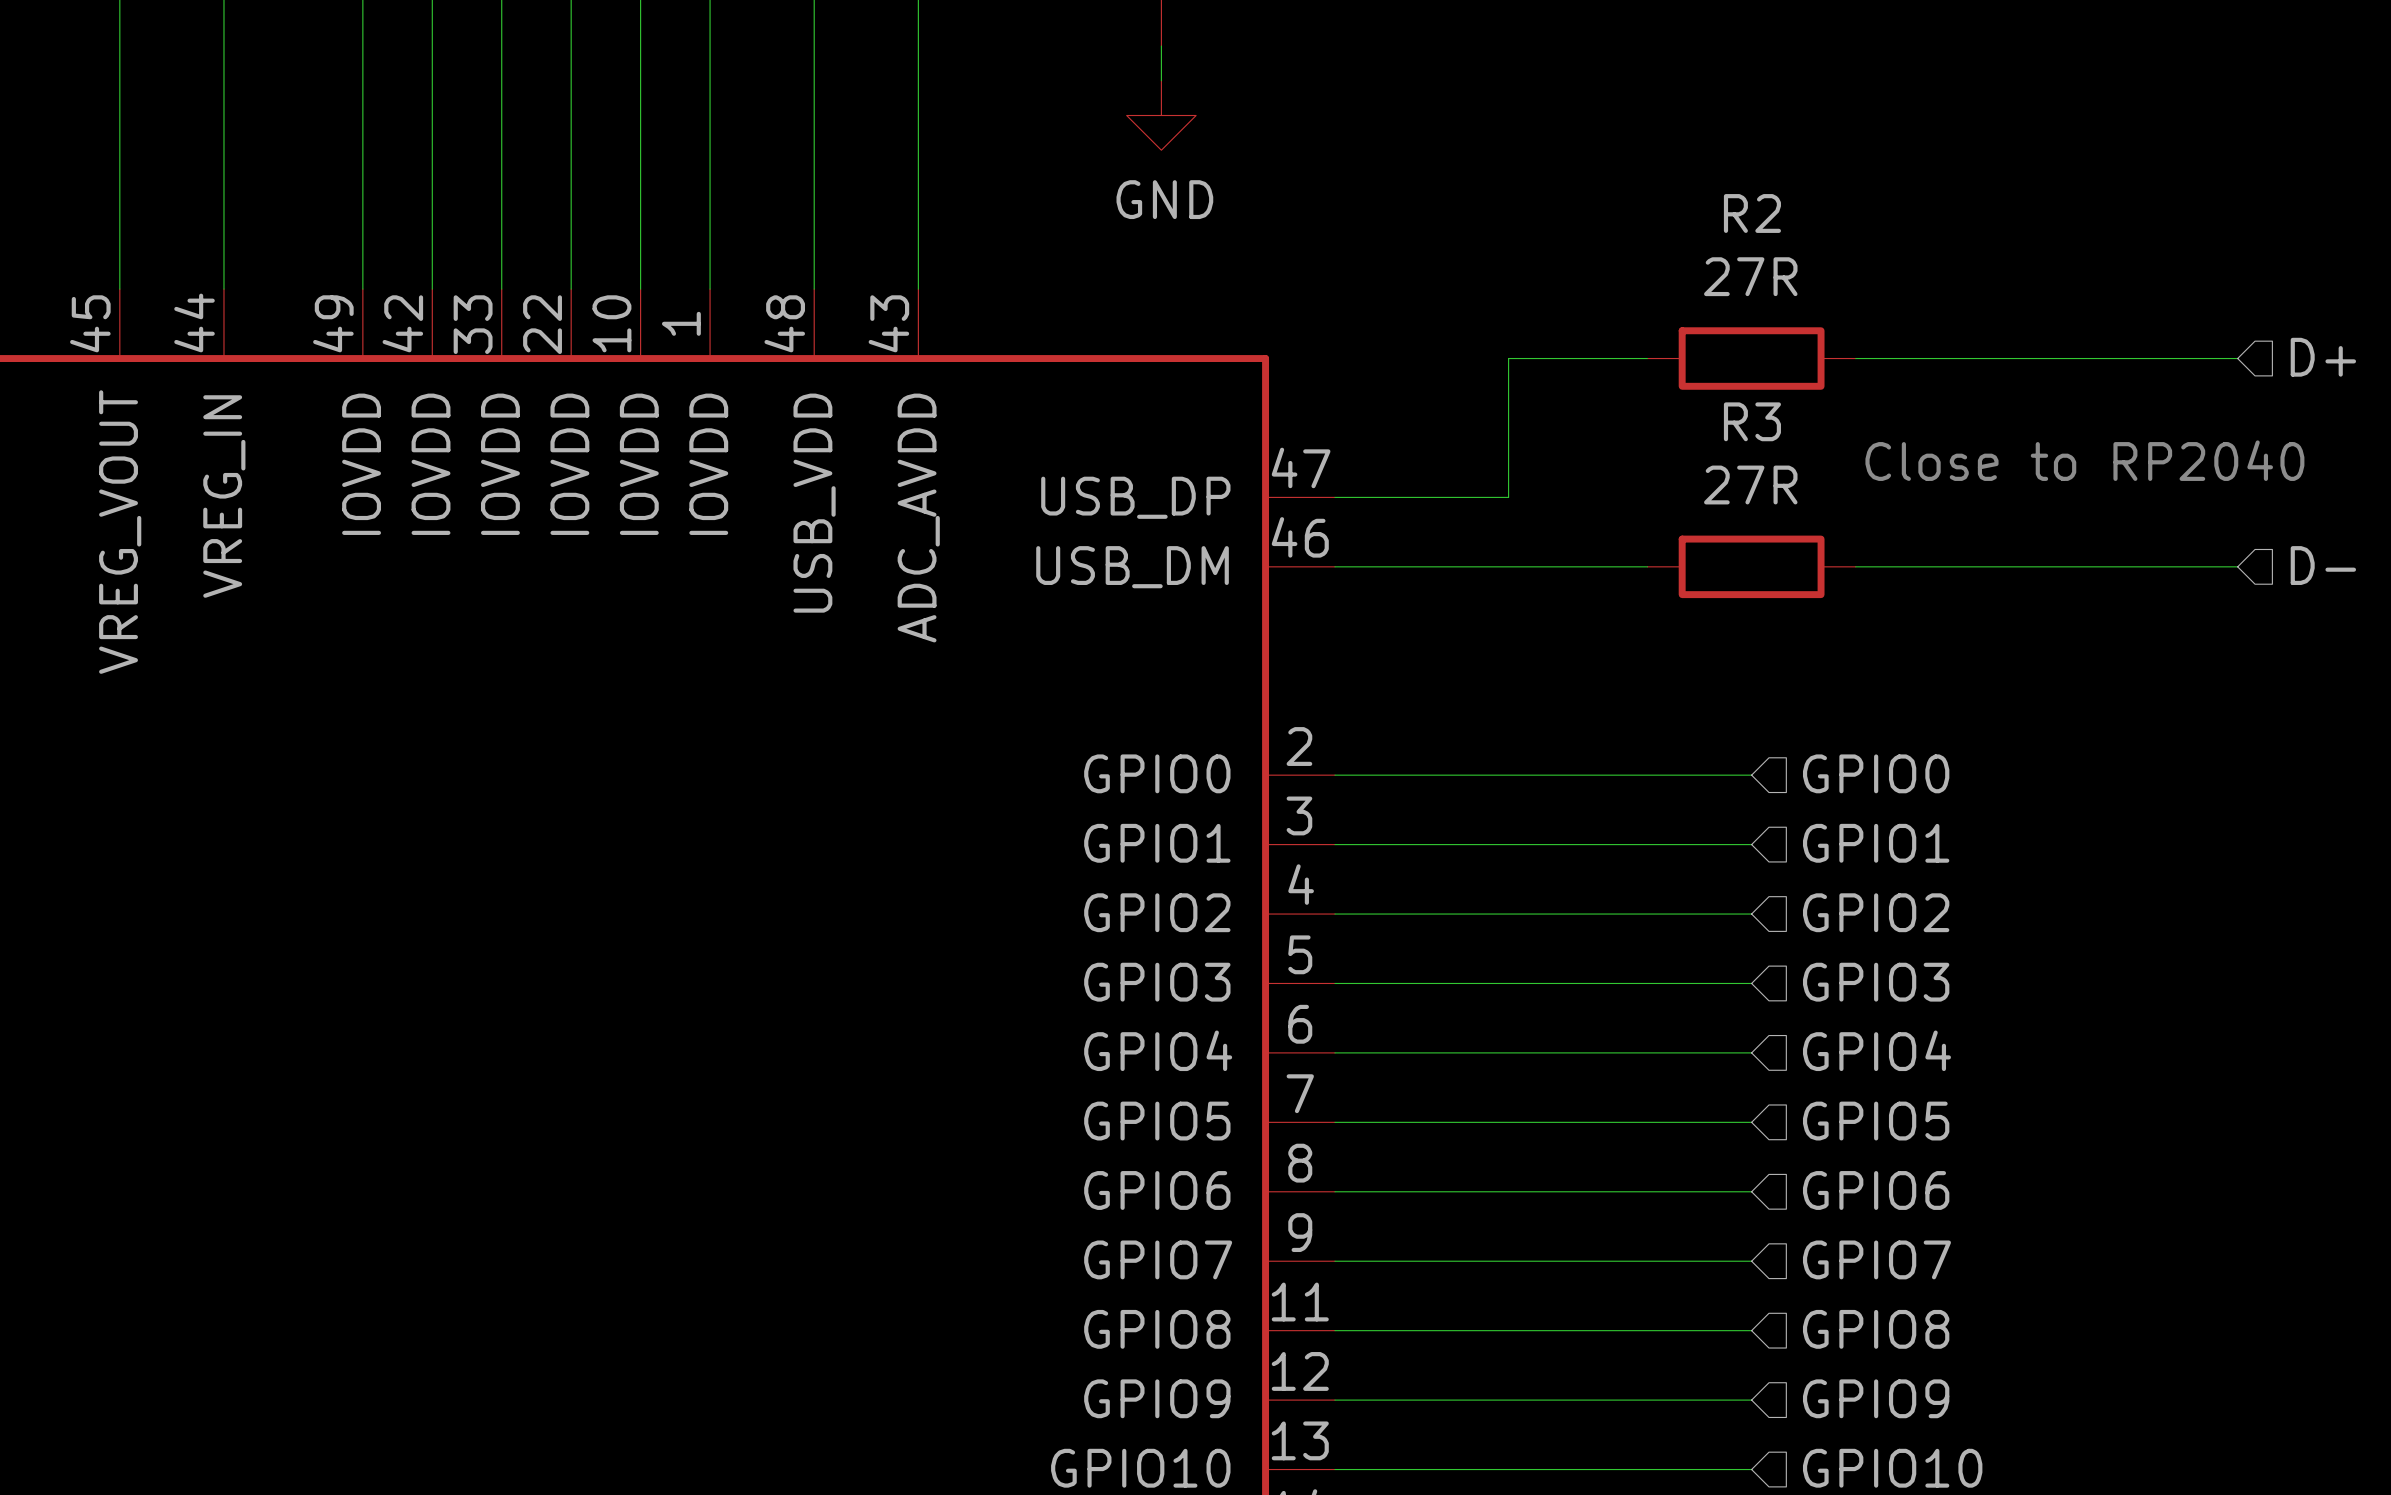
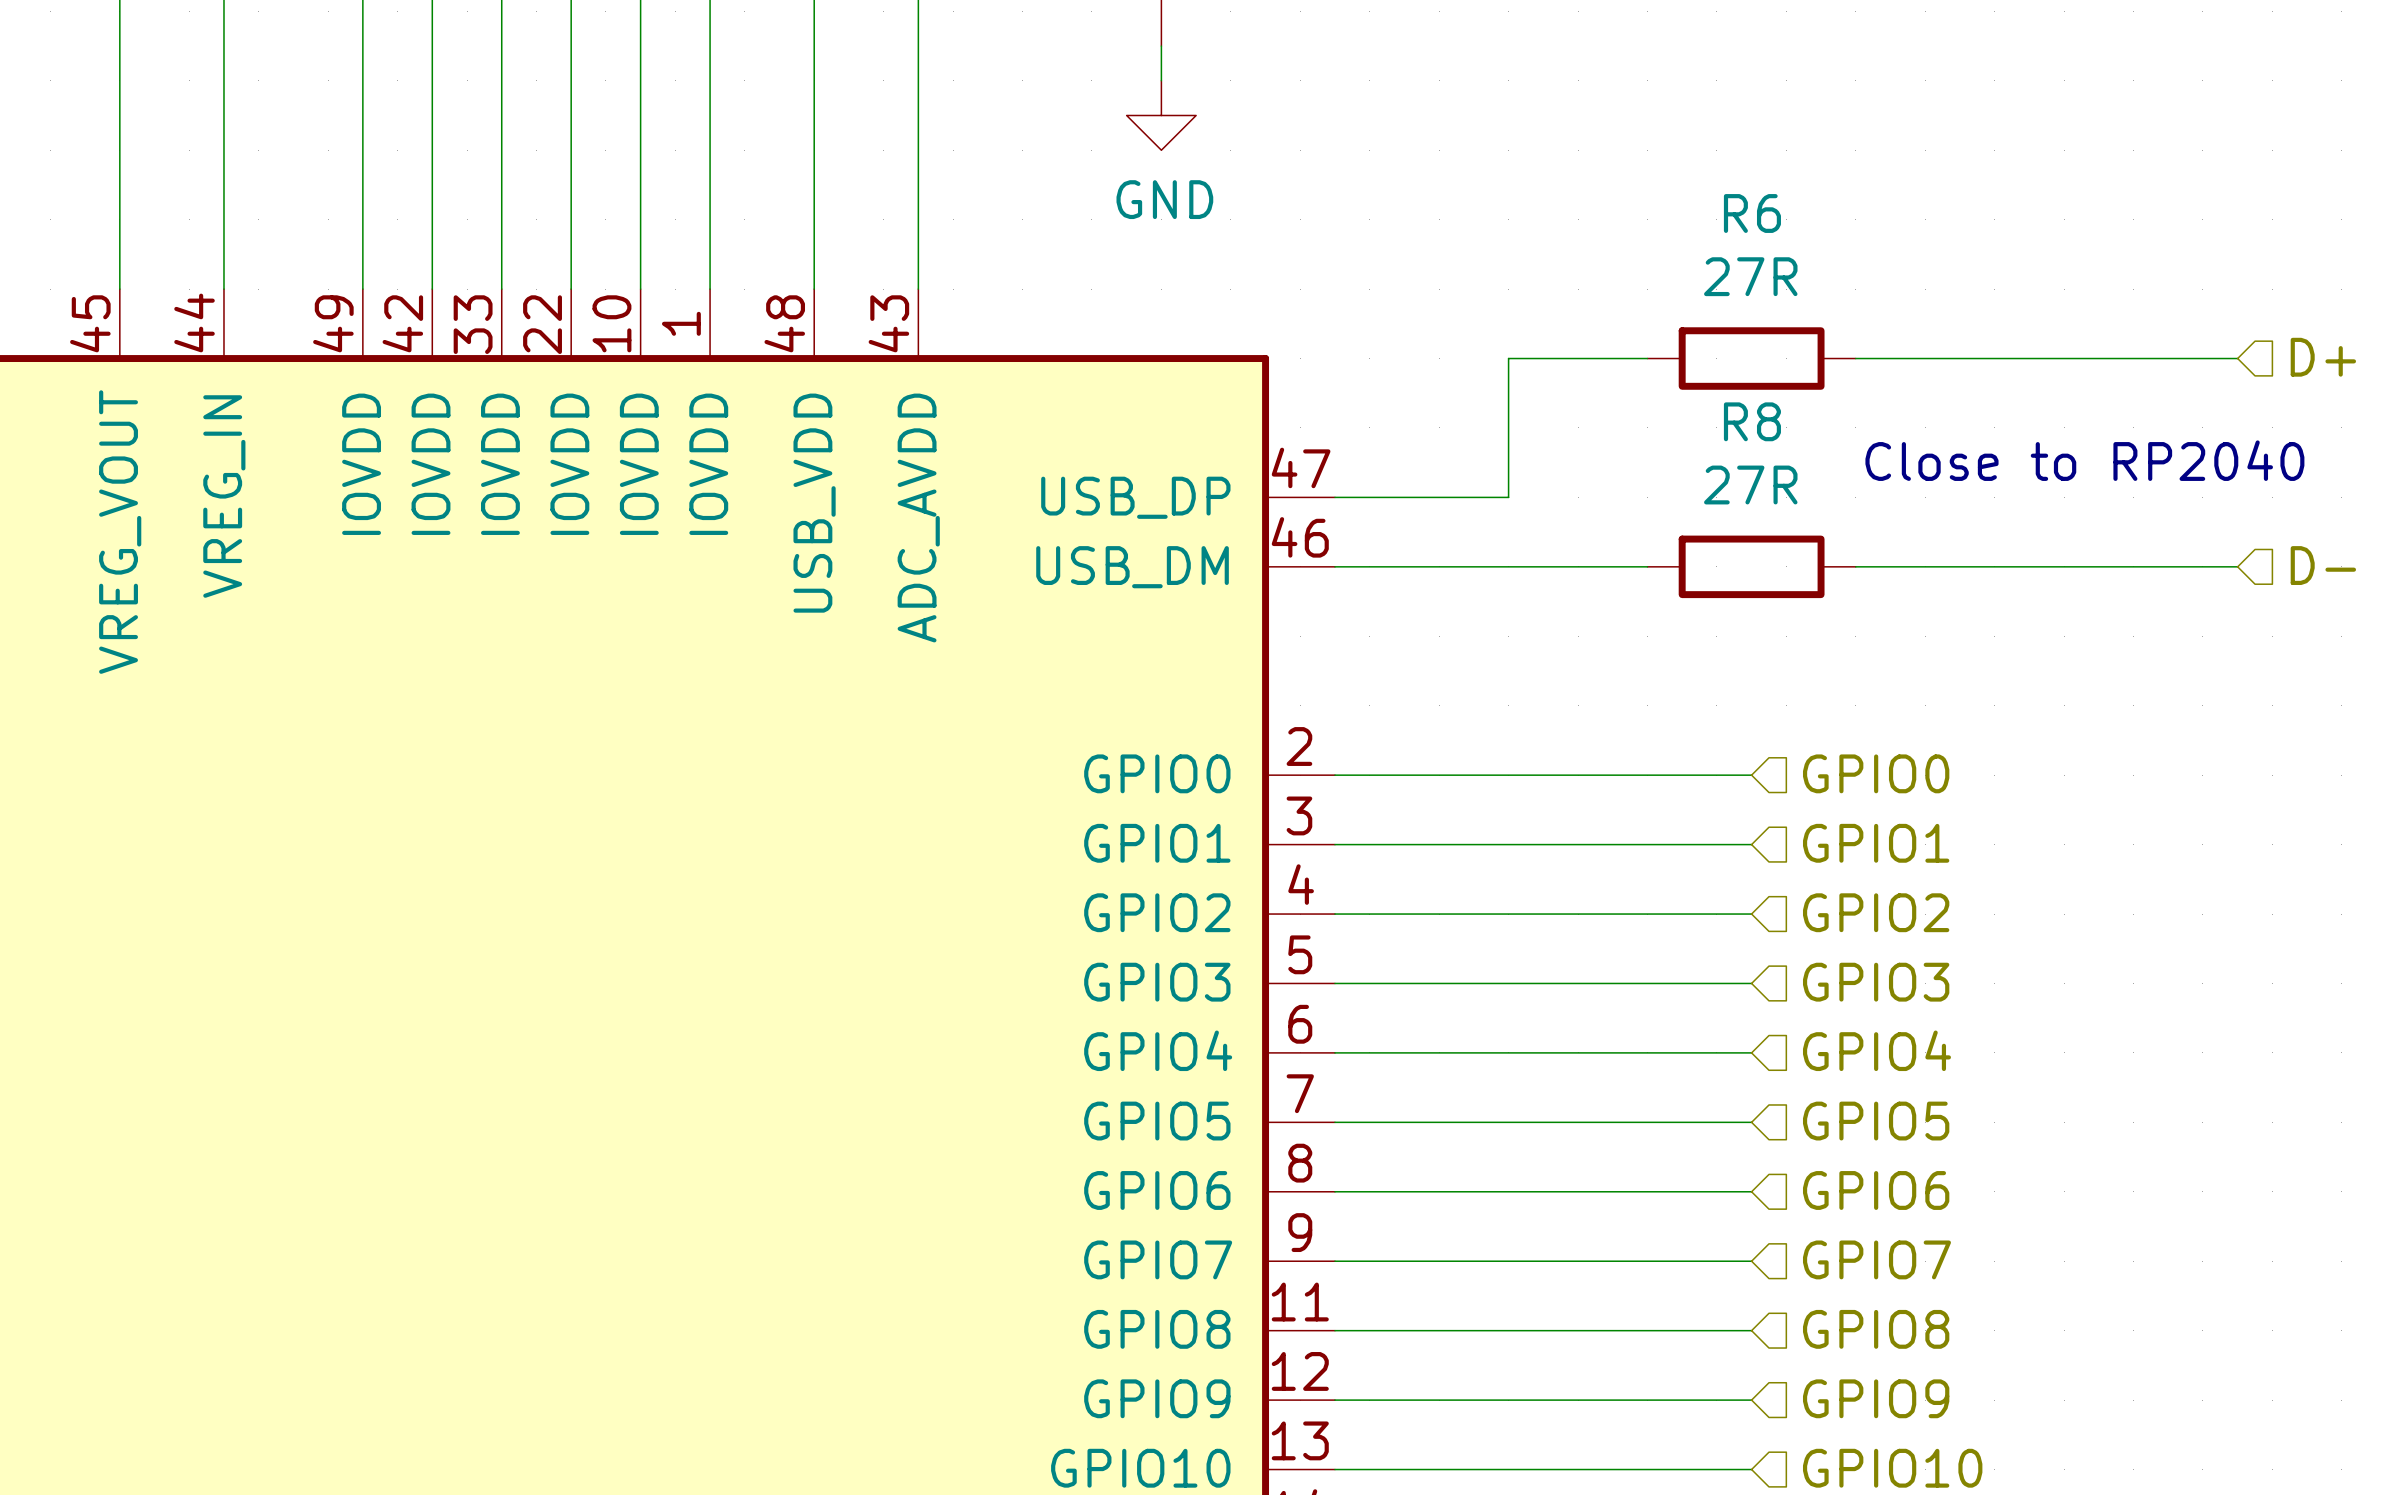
R2 name: R2 (1752, 213) -> R6 (1752, 213)
R3 name: R3 (1752, 421) -> R8 (1752, 421)

